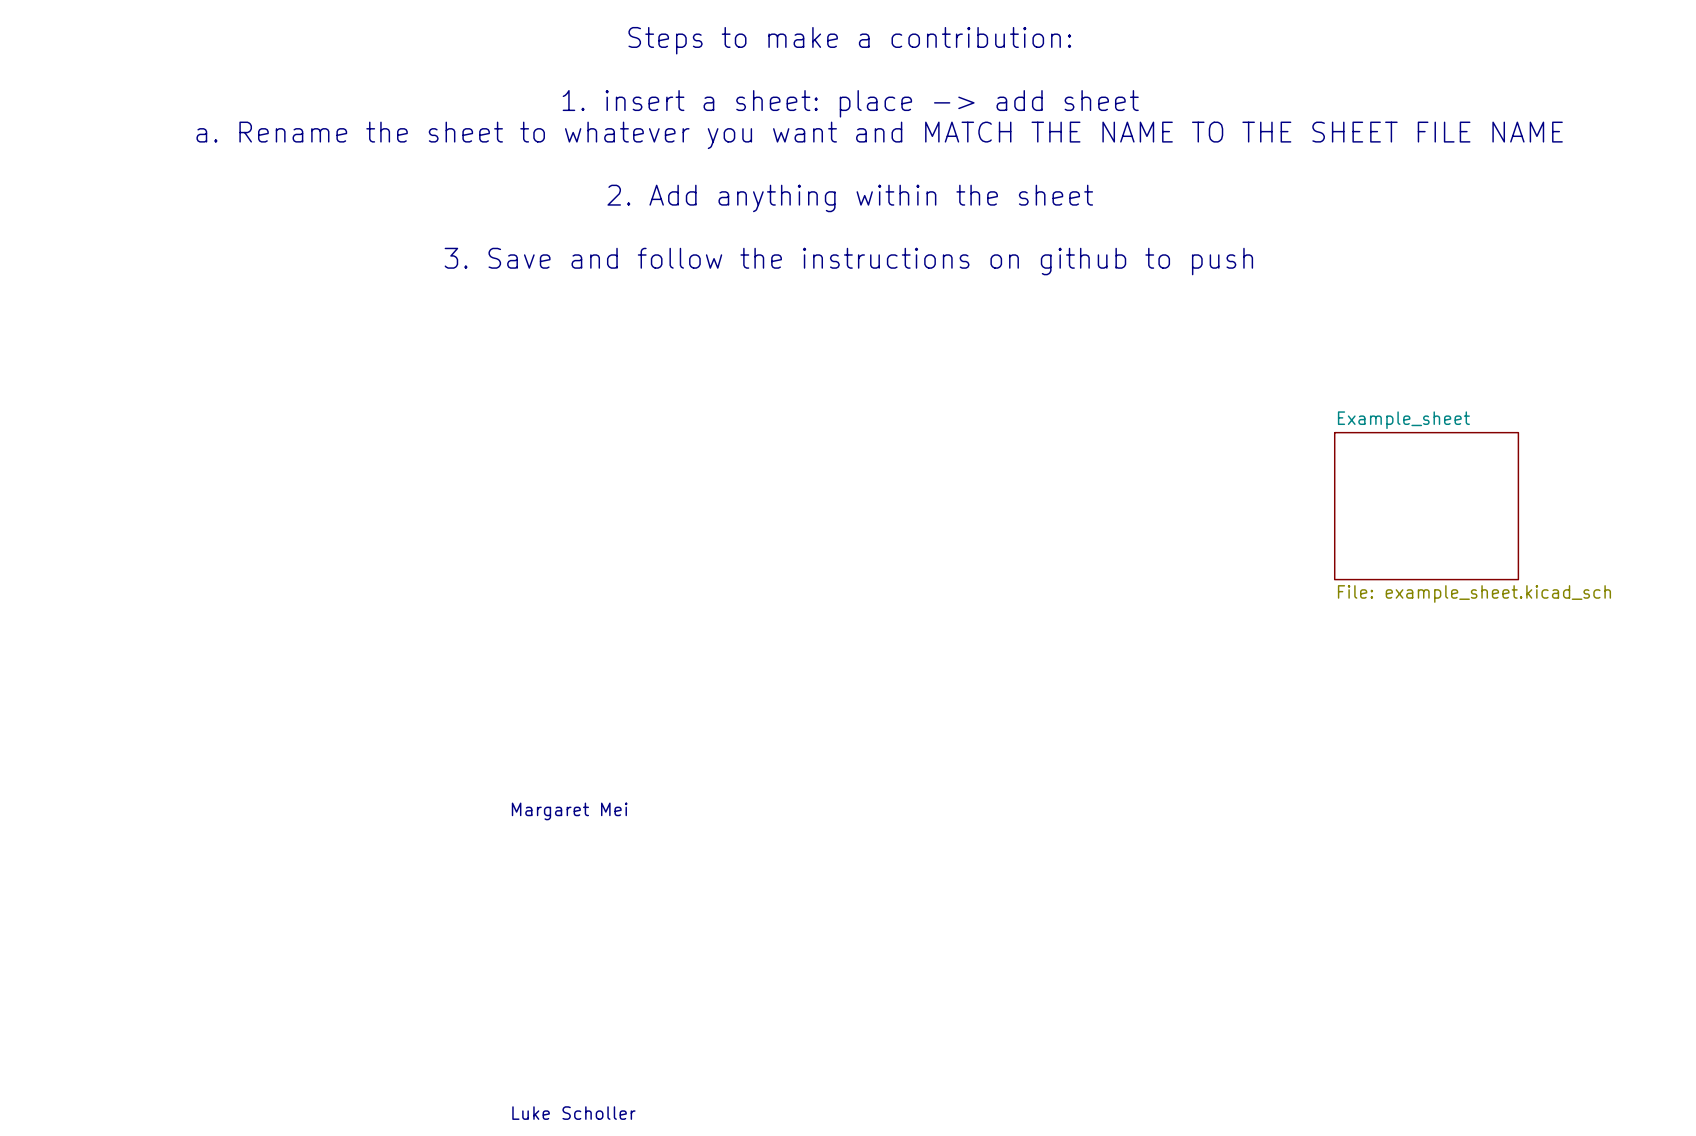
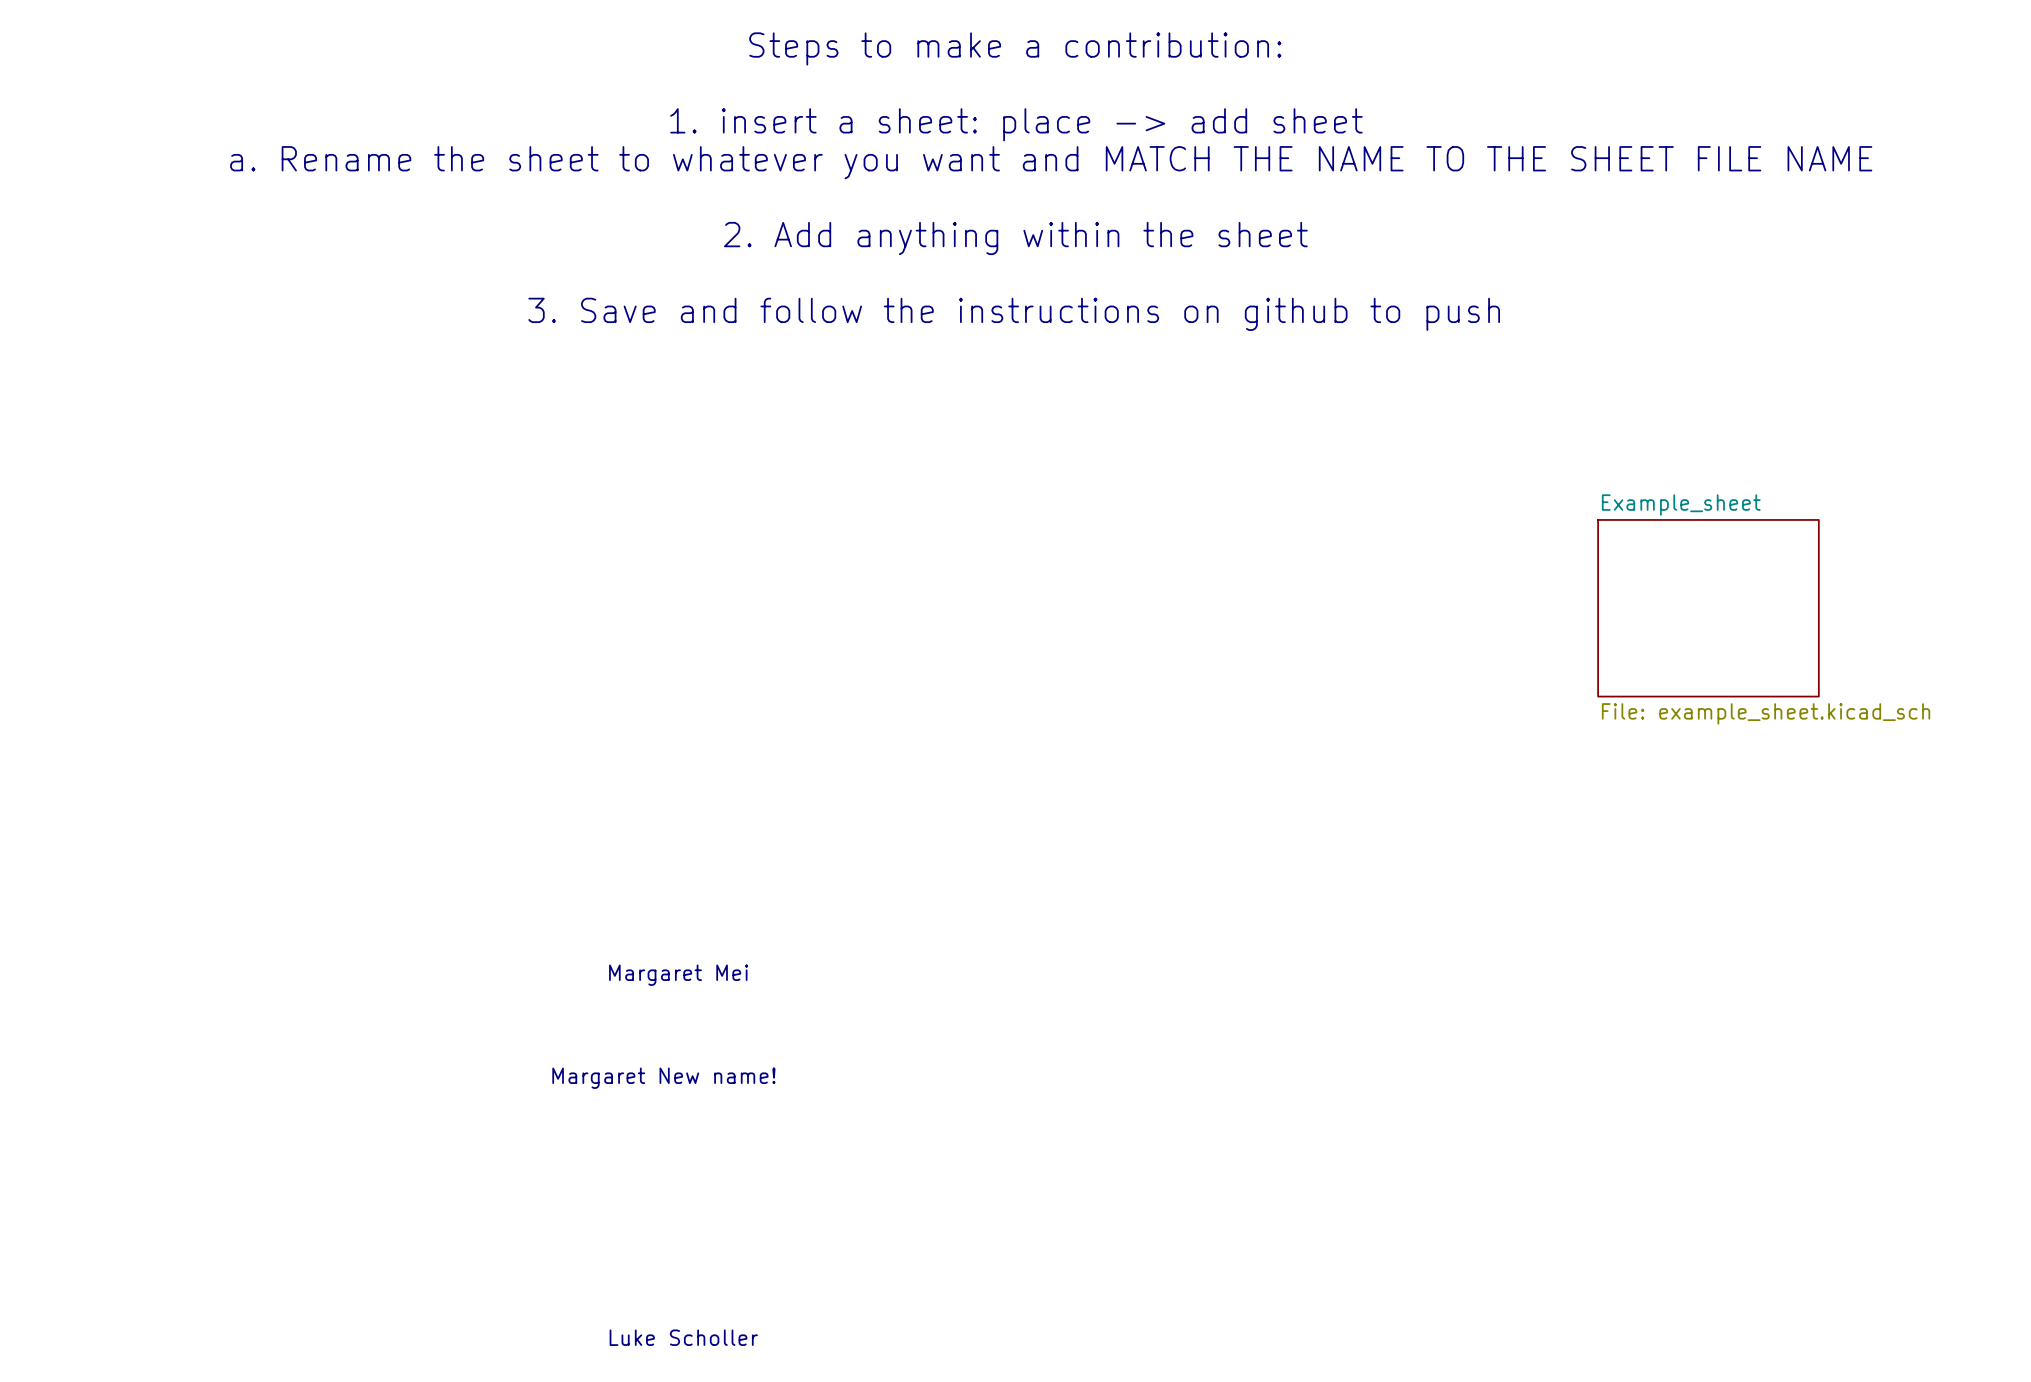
text: none -> Margaret New name! (663, 1078)

